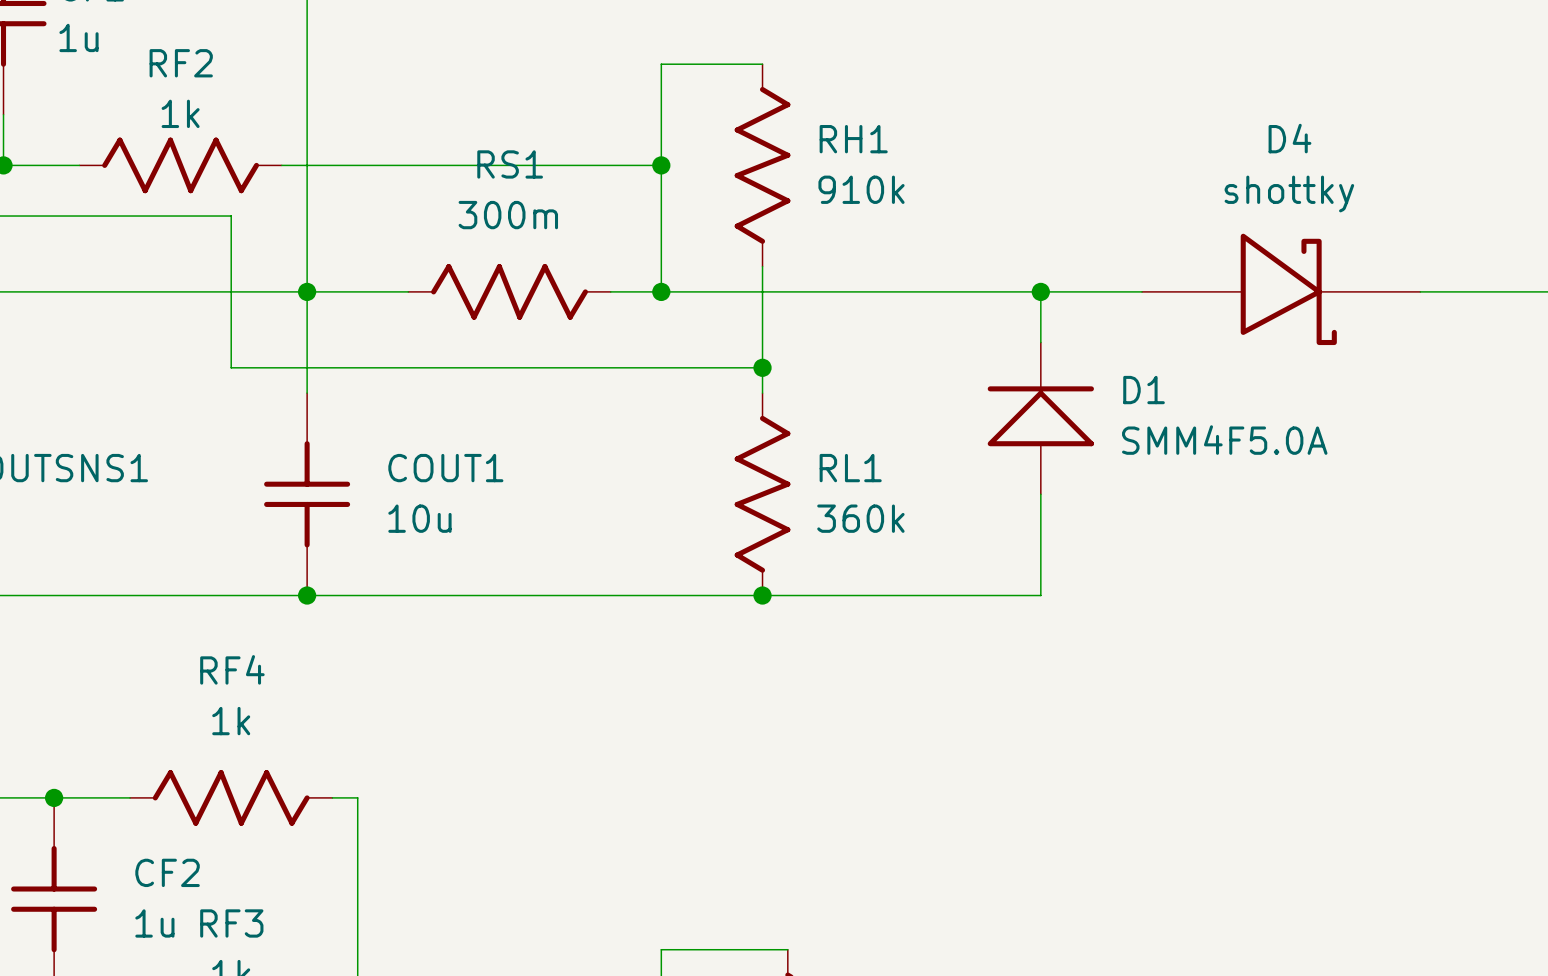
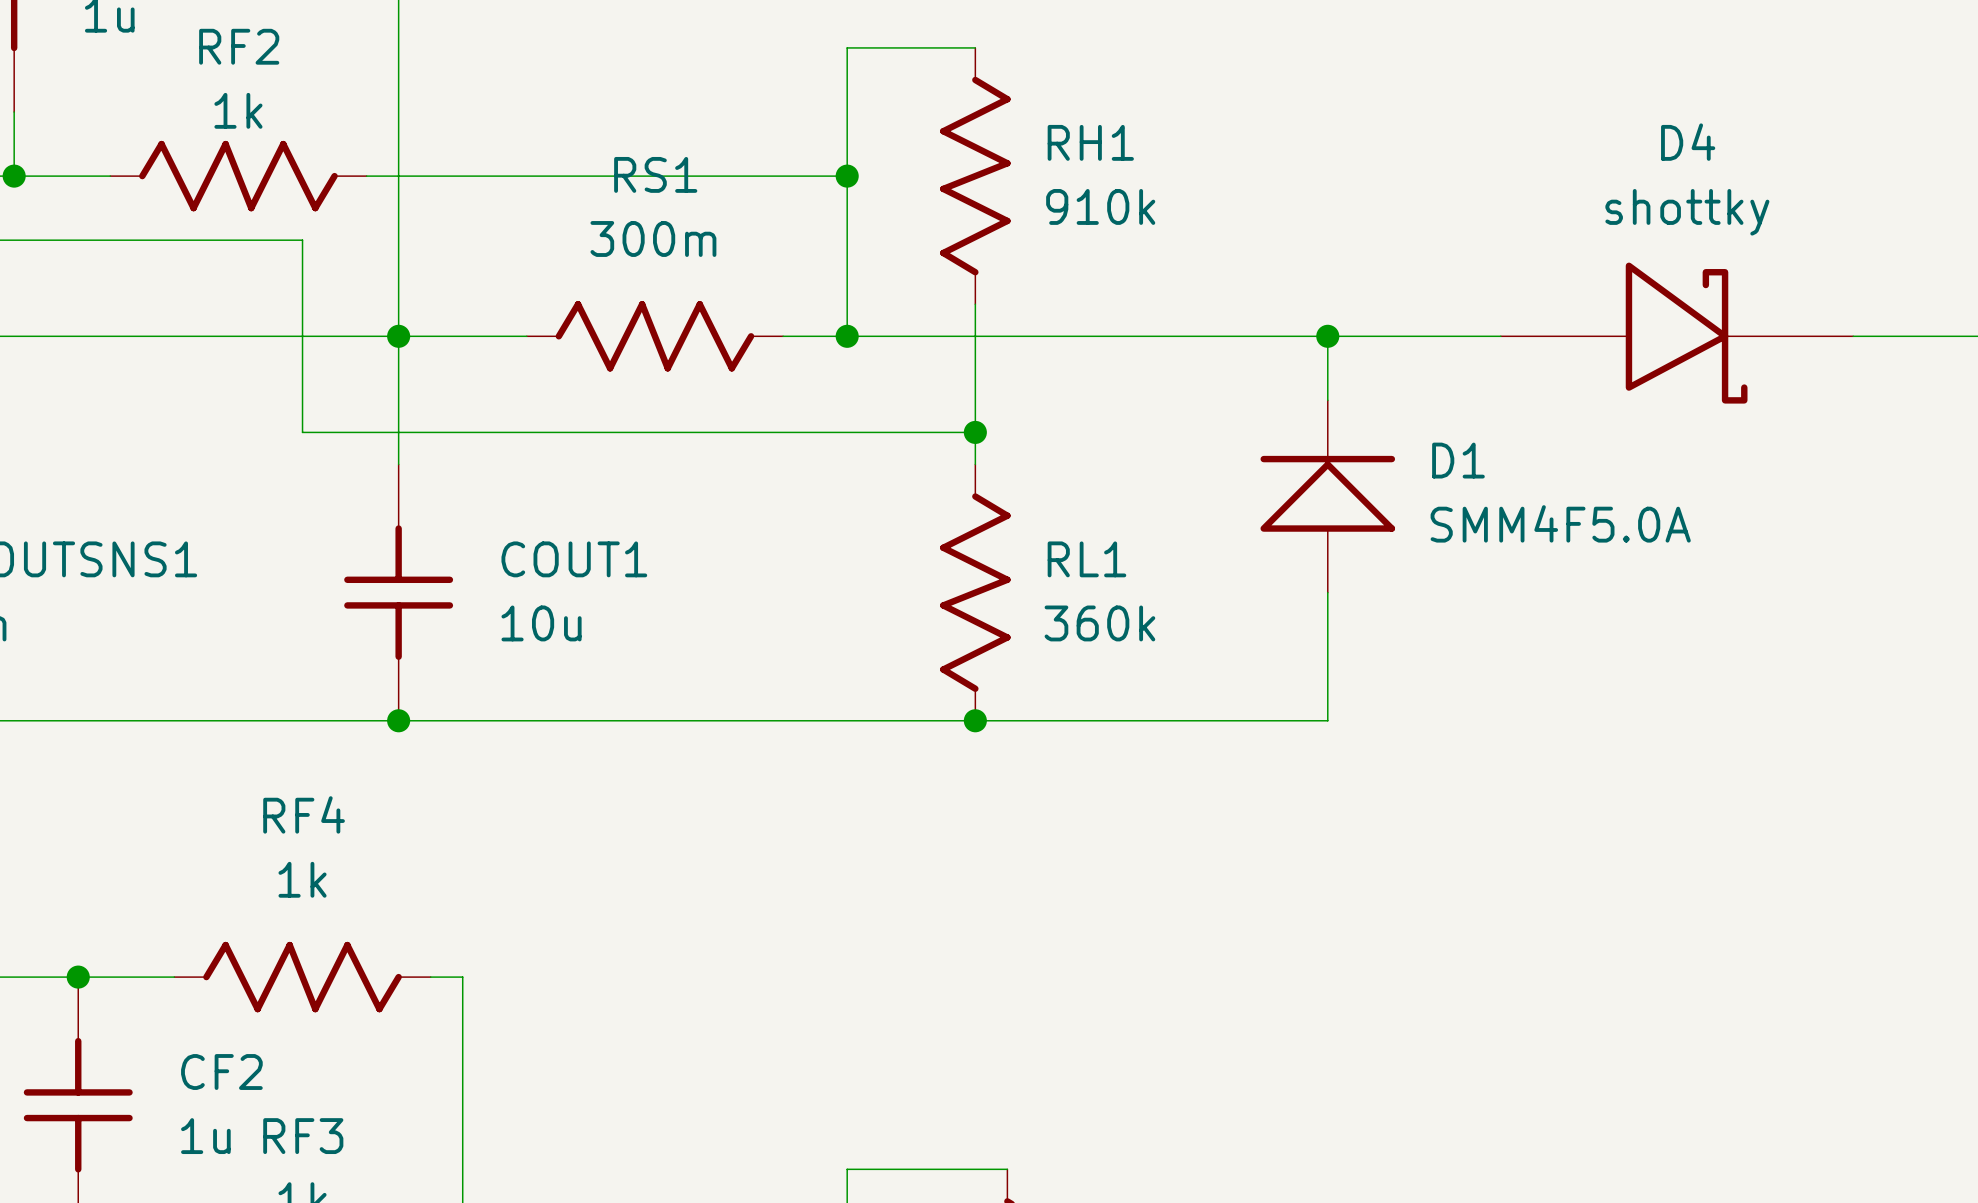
D4 position: (1281, 289) -> (1677, 333)

